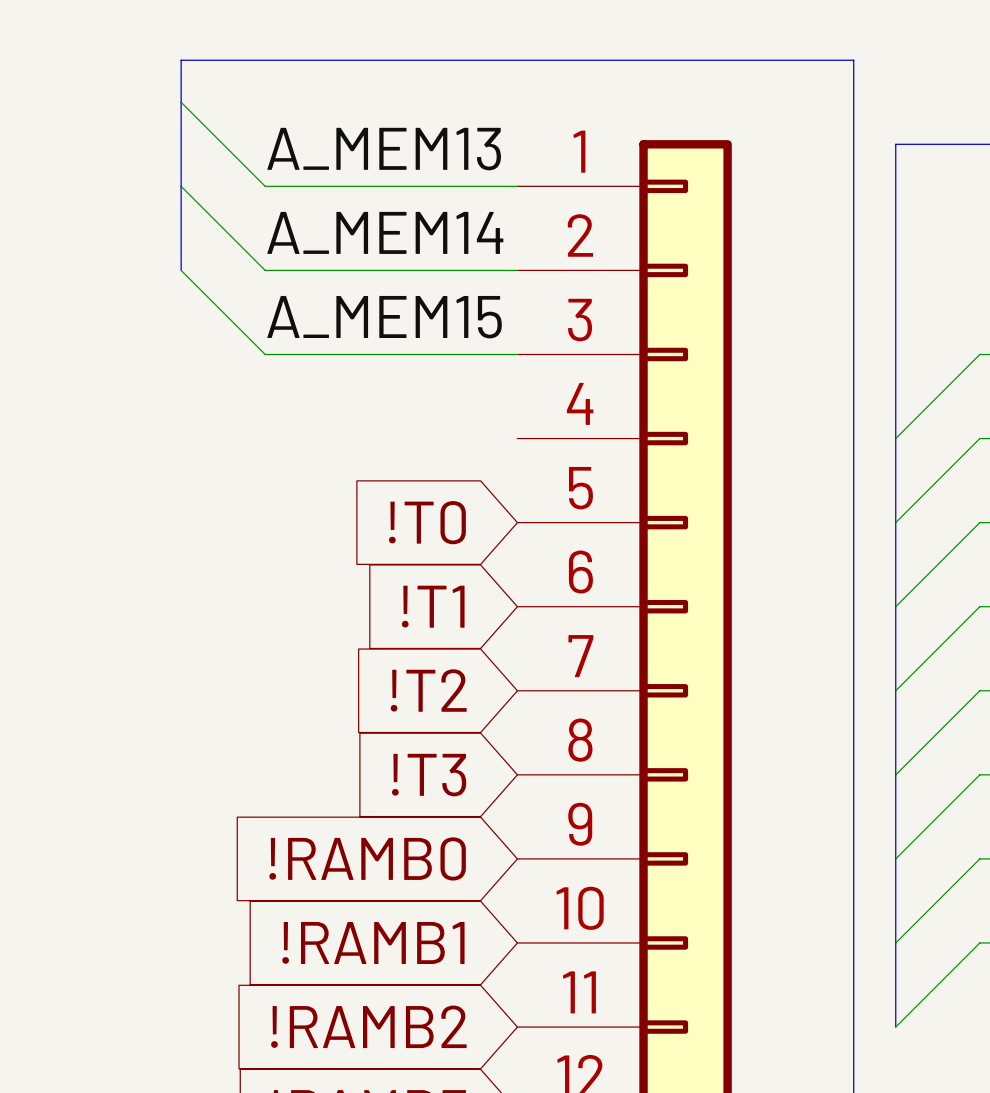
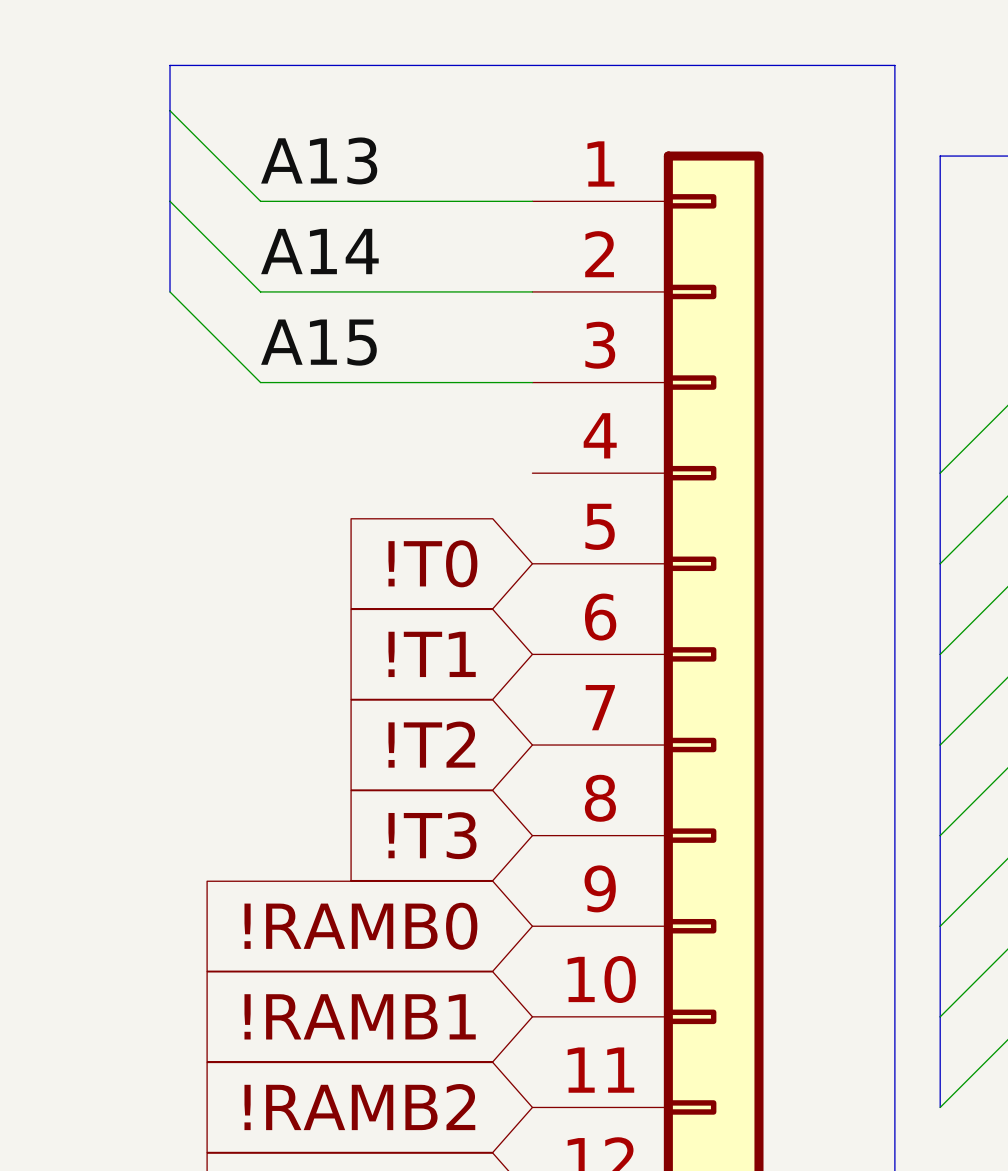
label: A_MEM13 (384, 149) -> A13 (319, 160)
label: A_MEM14 (385, 232) -> A14 (319, 251)
label: A_MEM15 (384, 317) -> A15 (318, 342)

